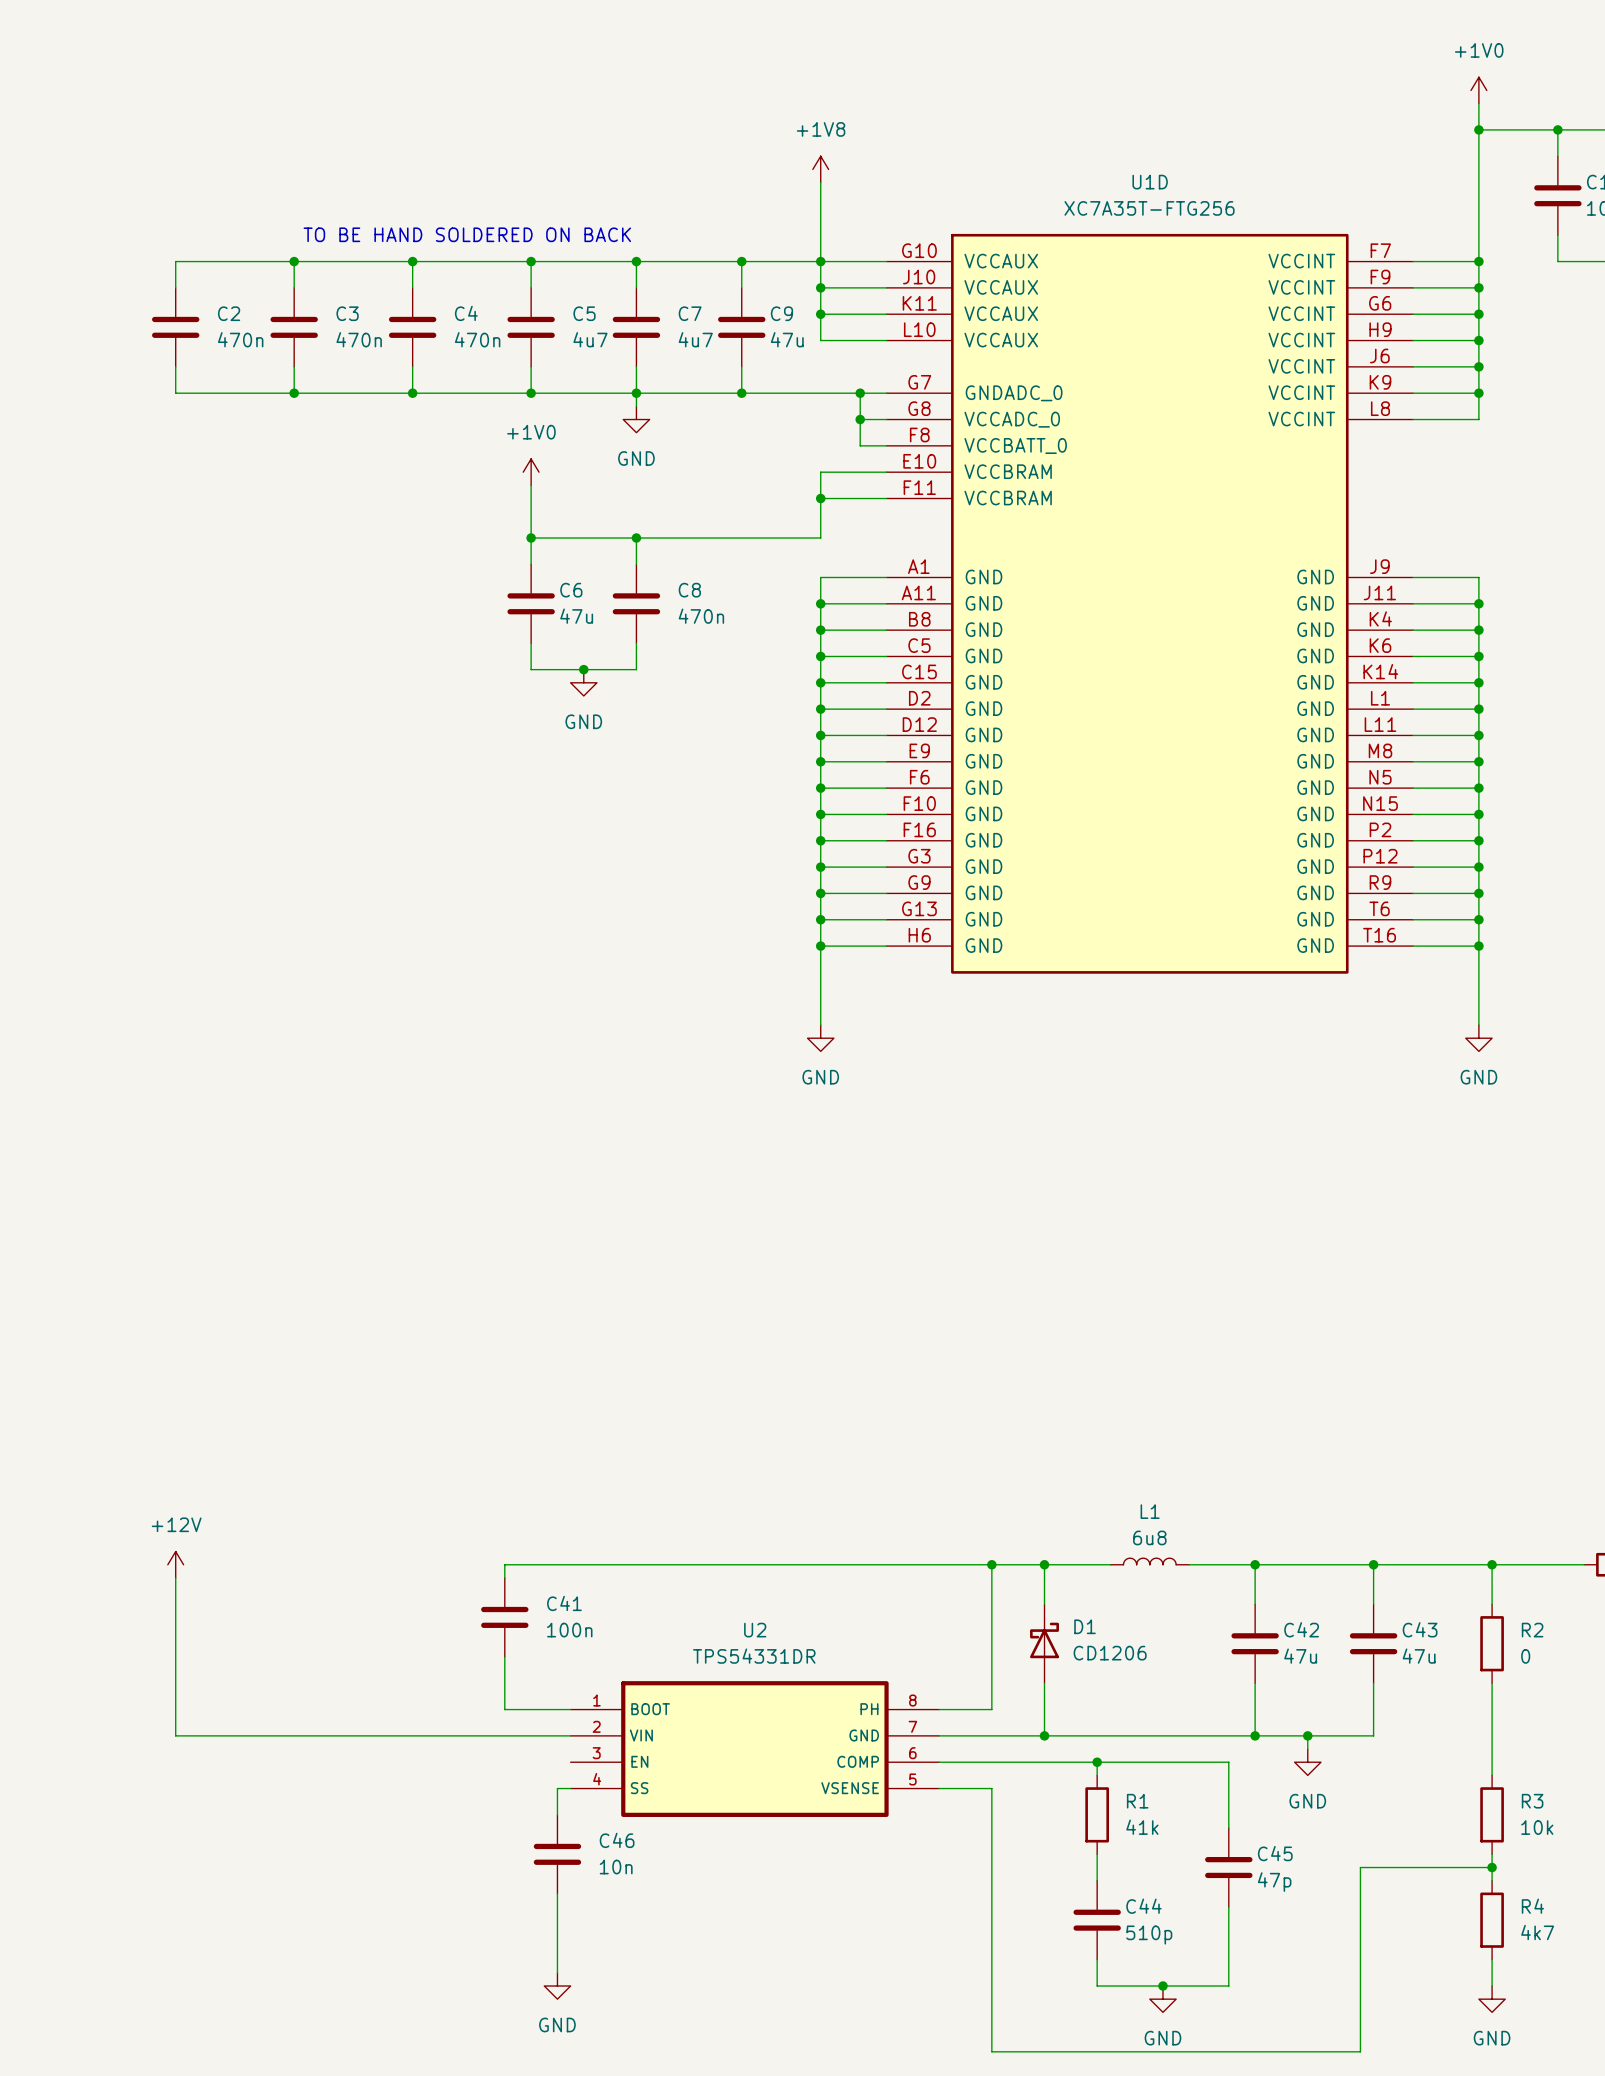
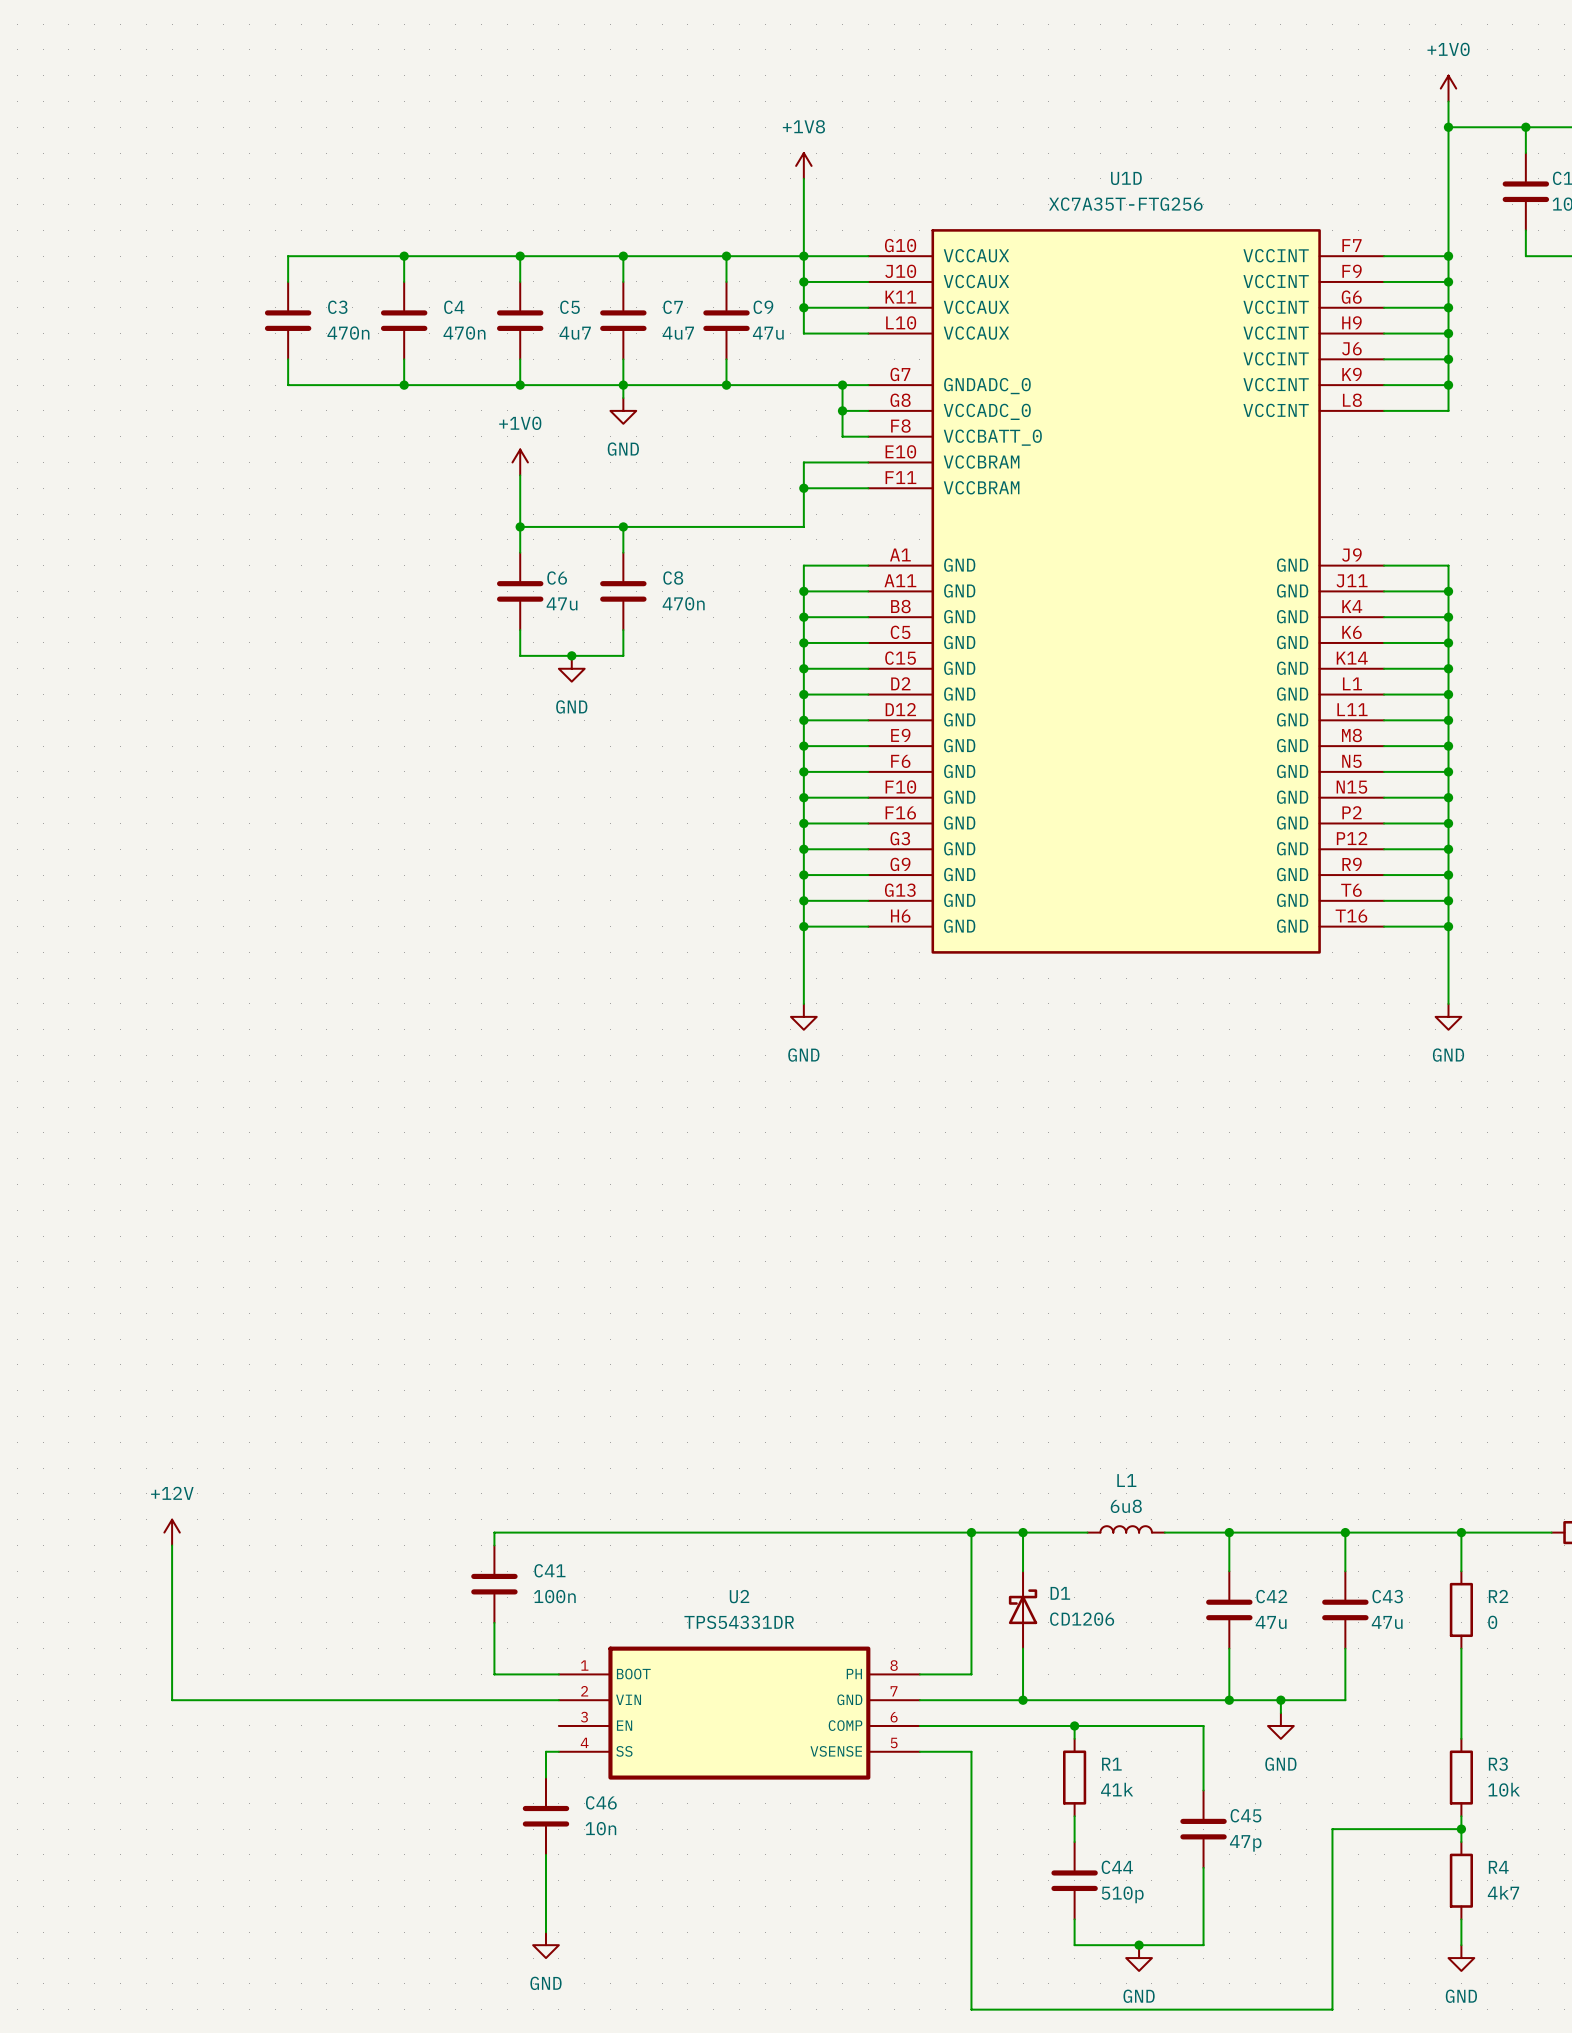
text: TO BE HAND SOLDERED ON BACK (467, 234) -> none
wire: (294, 261) (175, 261) (175, 287) -> none
junction: (294, 261) -> none
C2: 470n (175, 327) -> none
wire: (175, 366) (175, 393) (294, 393) -> none
junction: (294, 393) -> none

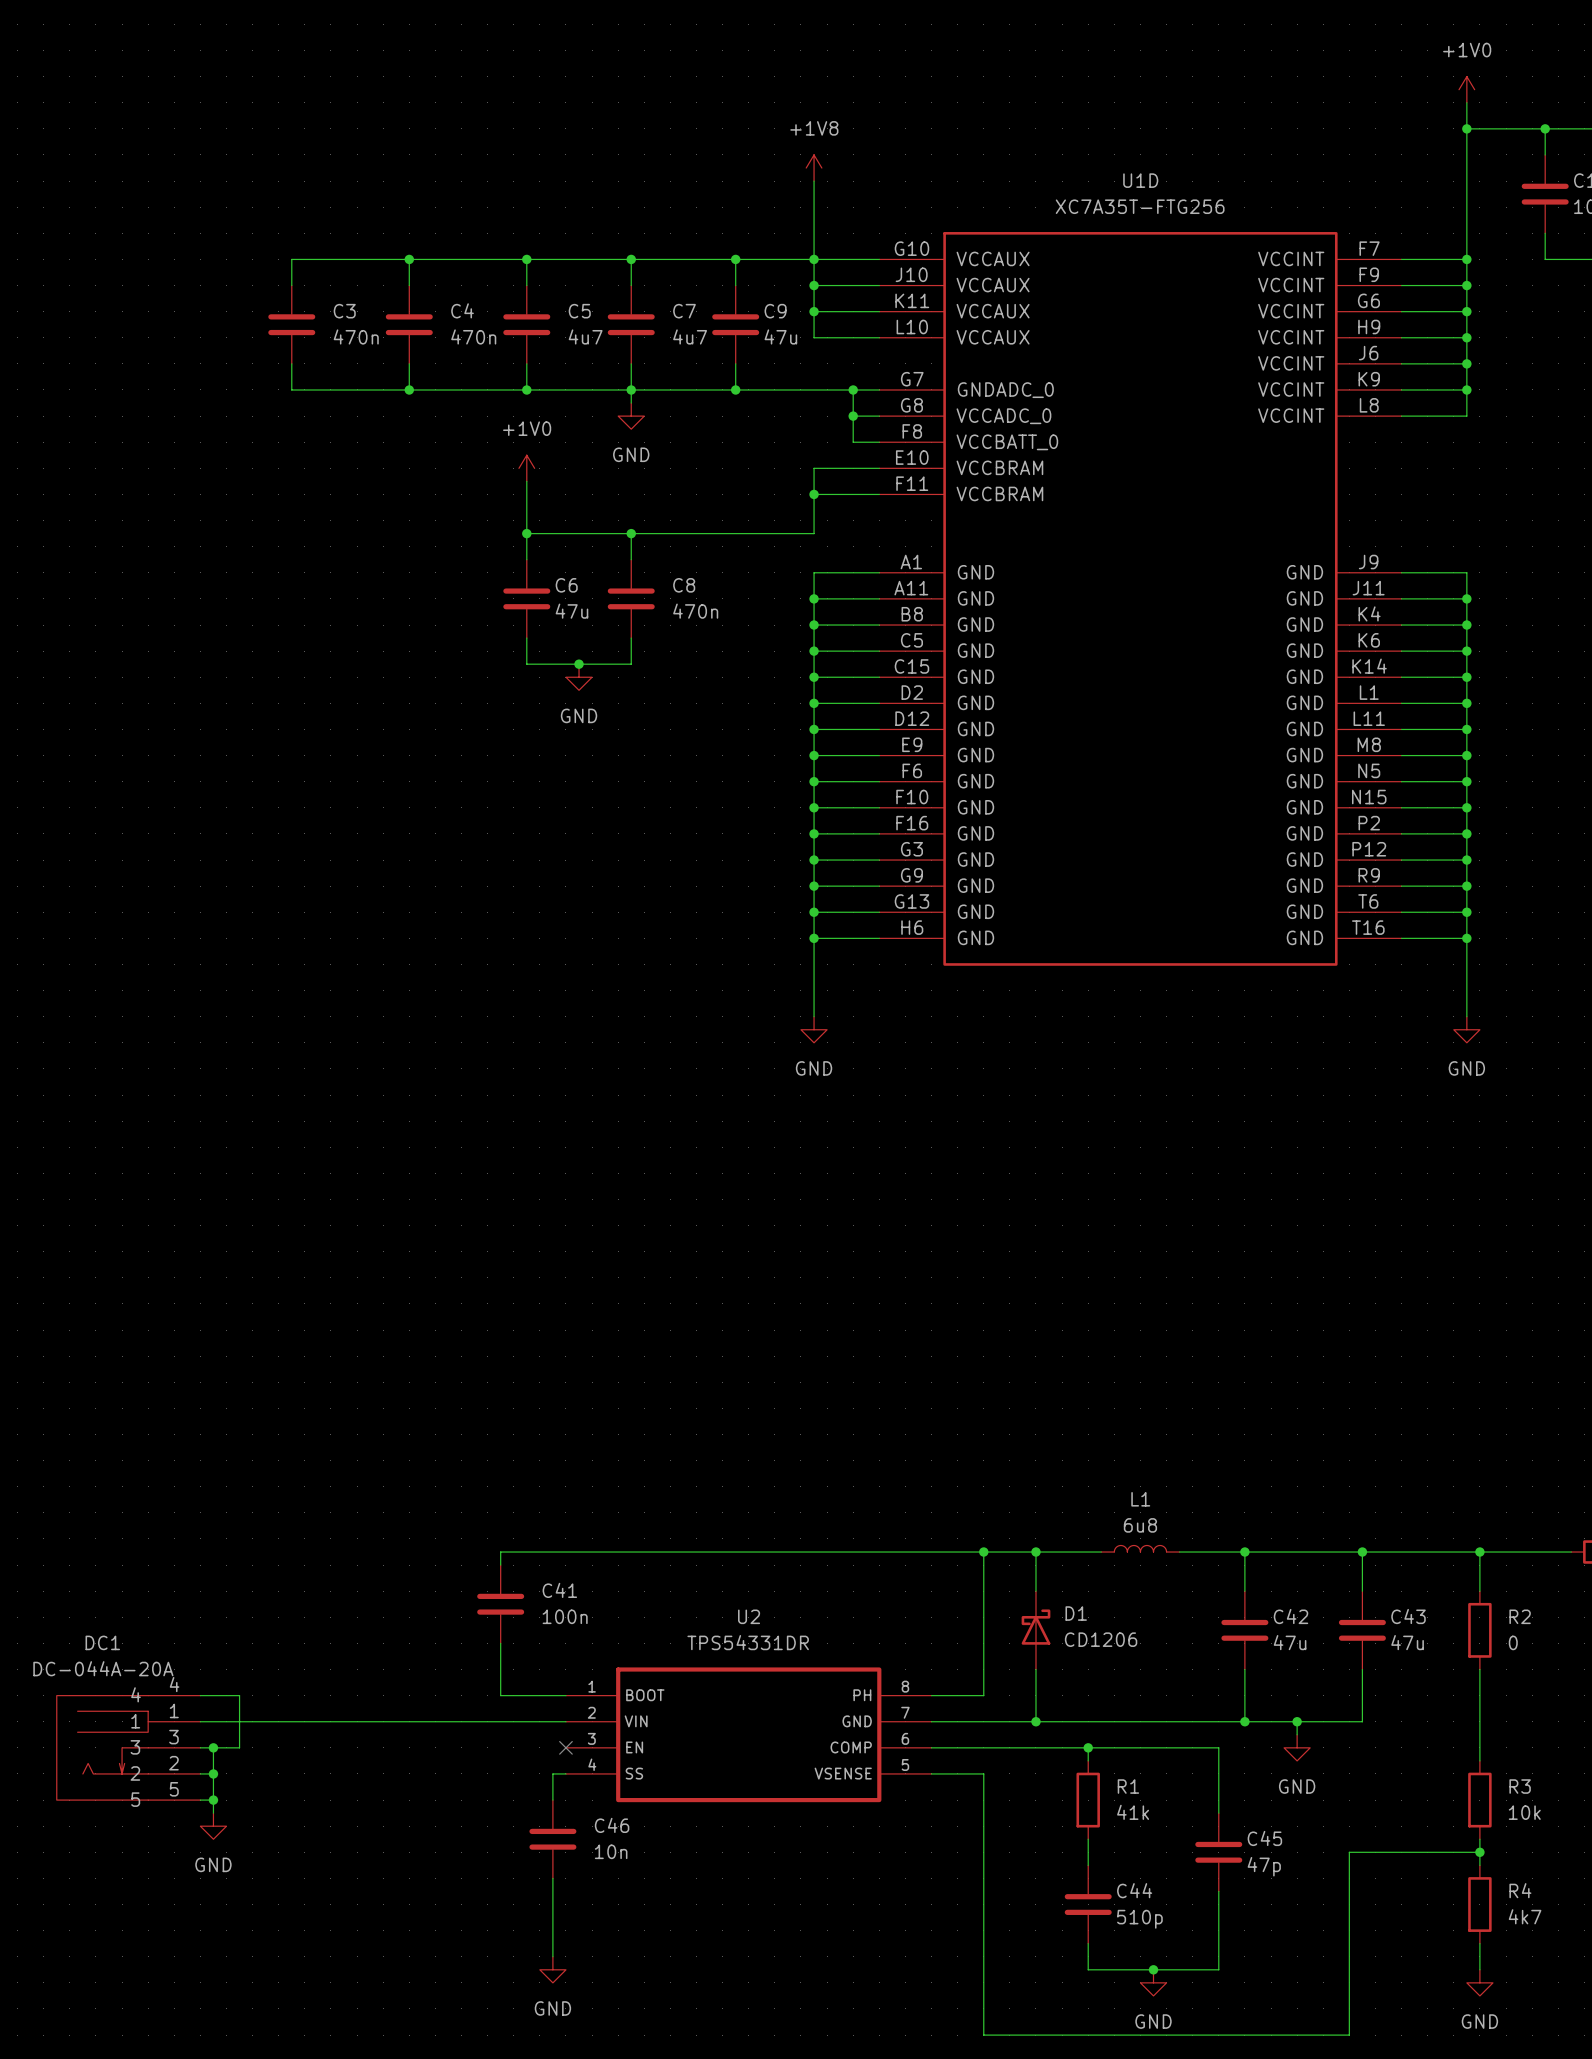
power symbol: +12V (172, 1532) -> none
wire: (172, 1545) (172, 1700) (197, 1700) -> none
wire: none -> (200, 1695) (239, 1695) (239, 1747) (200, 1747)
DC1: none -> DC-044A-20A (128, 1747)
wire: none -> (213, 1747) (213, 1813)
junction: none -> (213, 1747)
no-connect mark: none -> (565, 1747)
wire: none -> (200, 1773) (213, 1773)
junction: none -> (213, 1773)
wire: none -> (200, 1800) (213, 1800)
junction: none -> (213, 1800)
power symbol: none -> GND (213, 1826)

